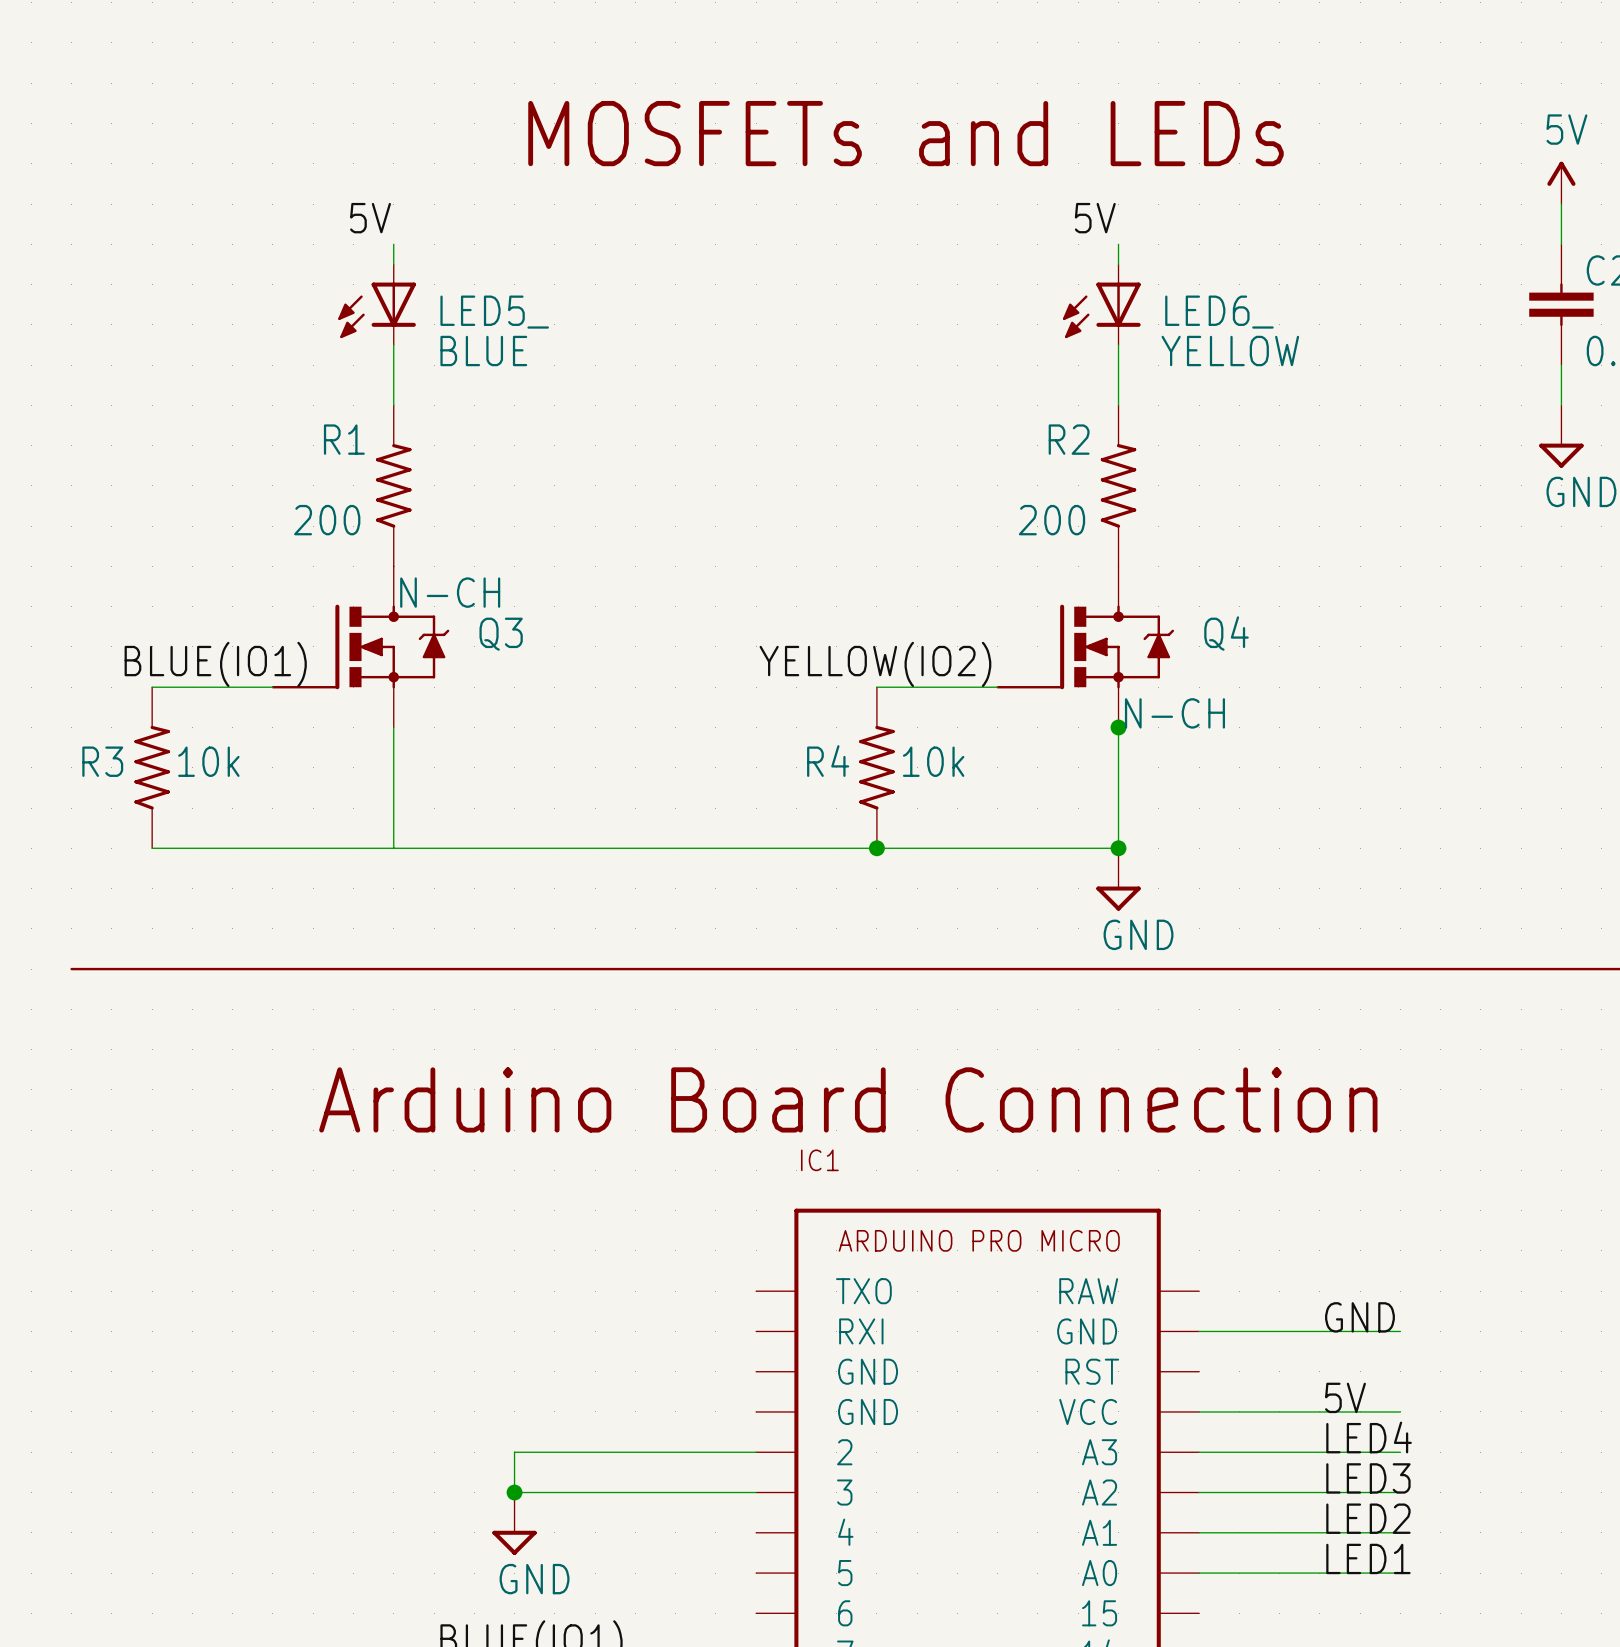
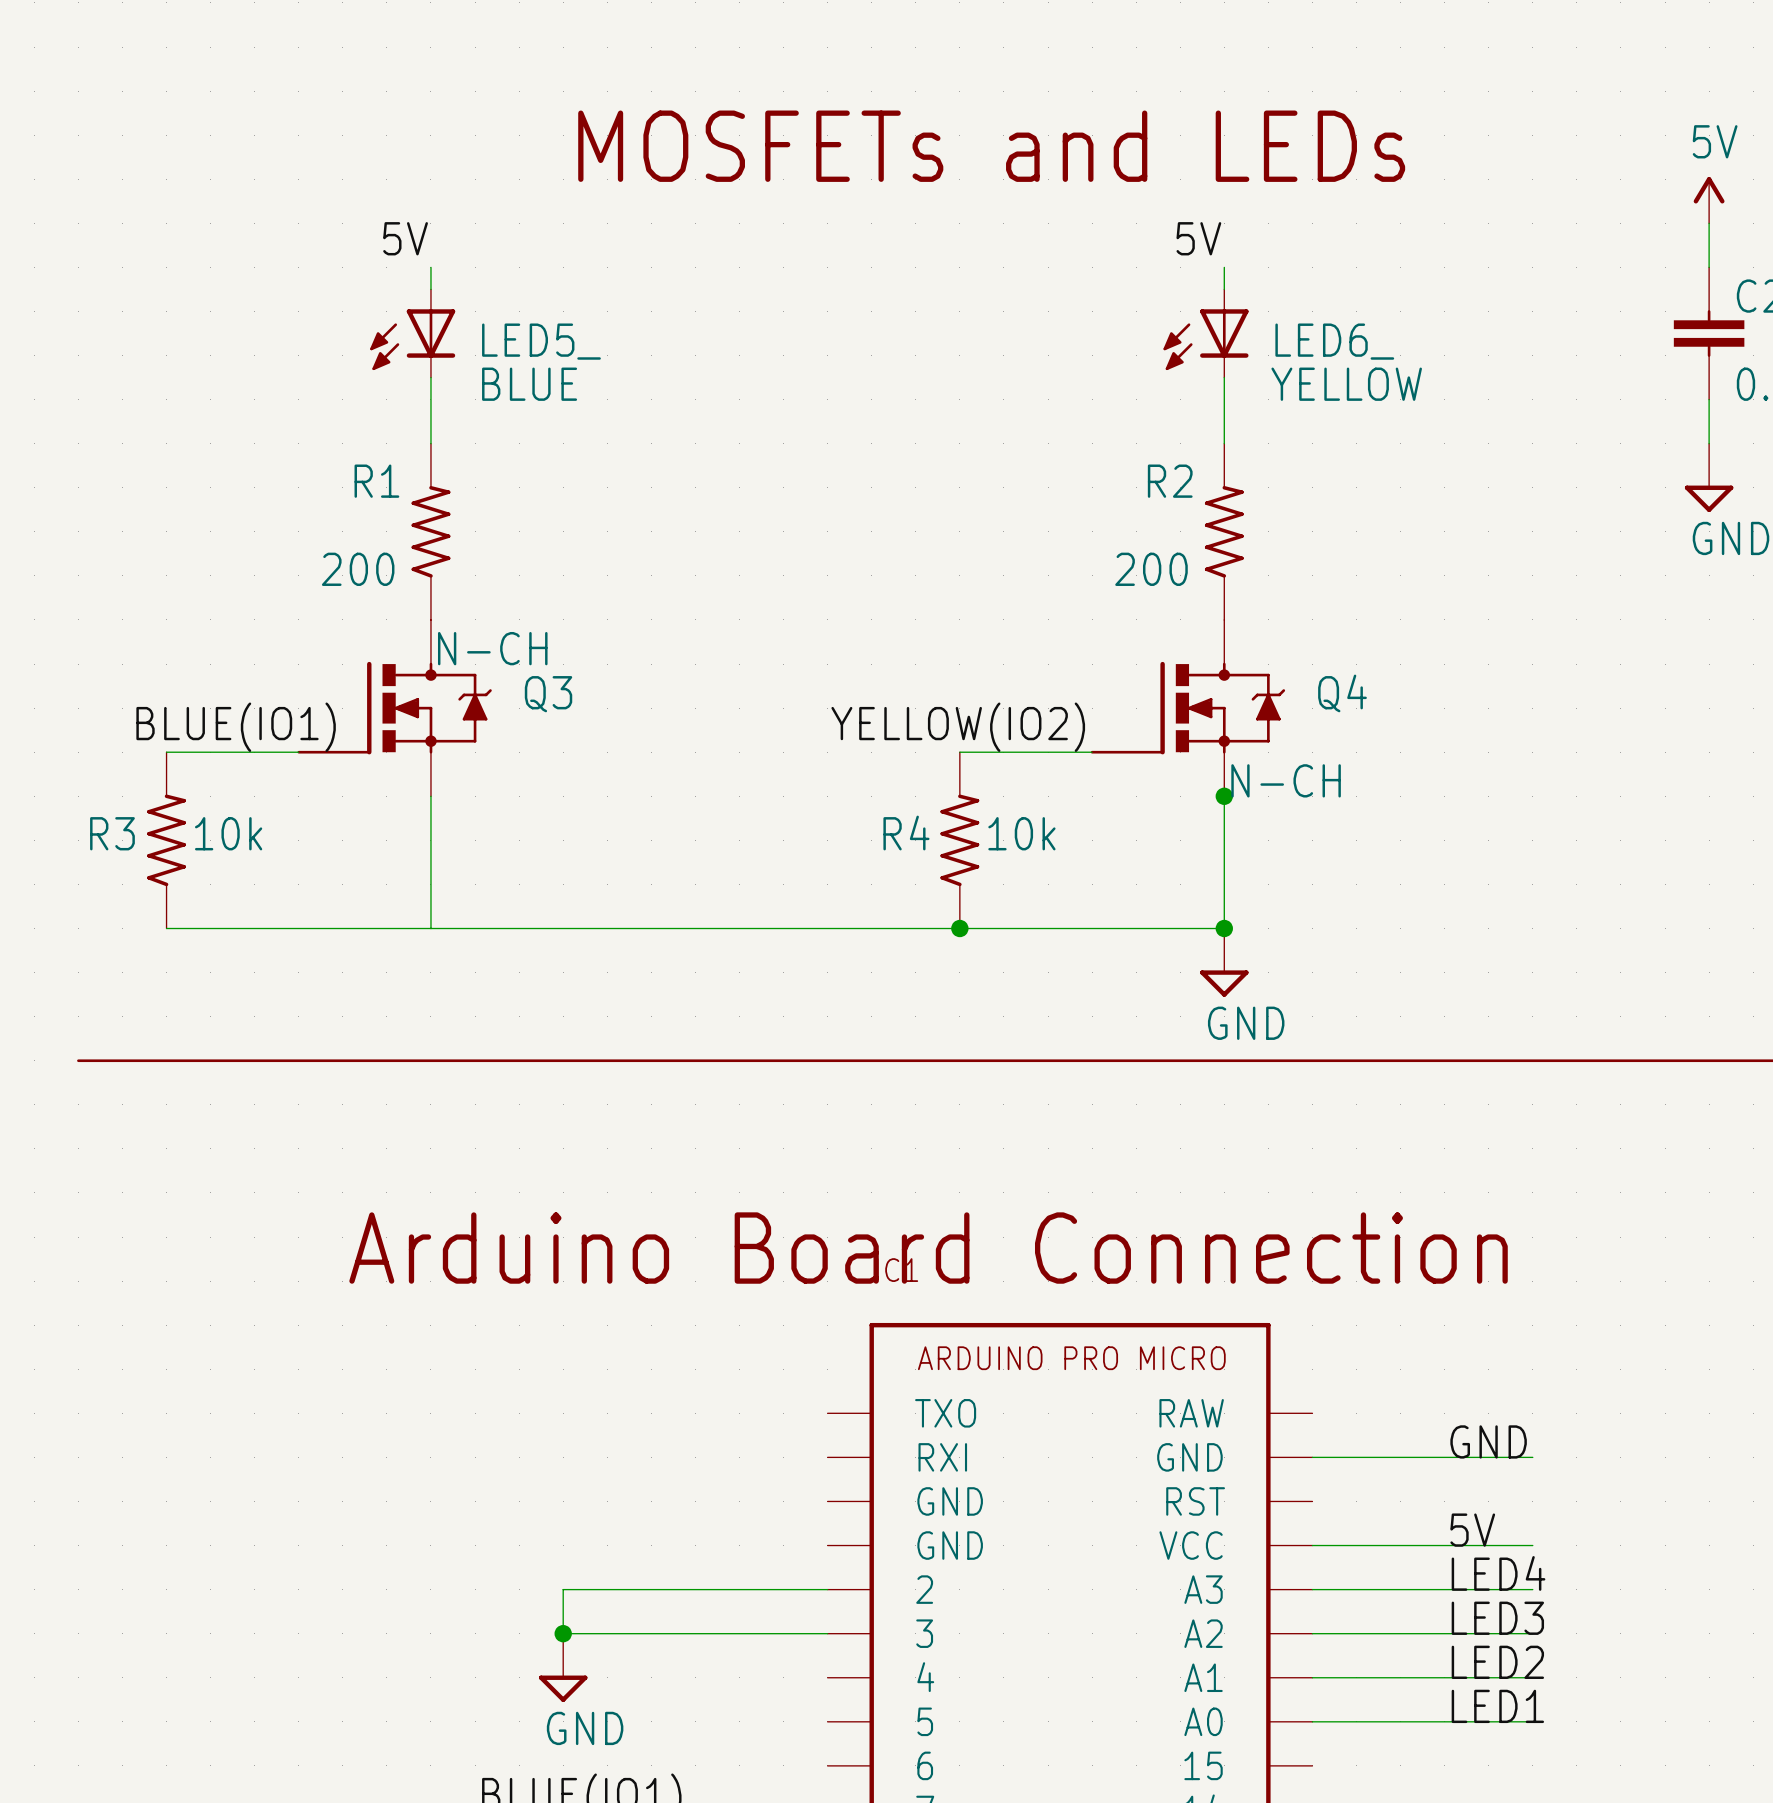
text position: Arduino Board Connection (848, 1099) -> Arduino Board Connection (928, 1248)

